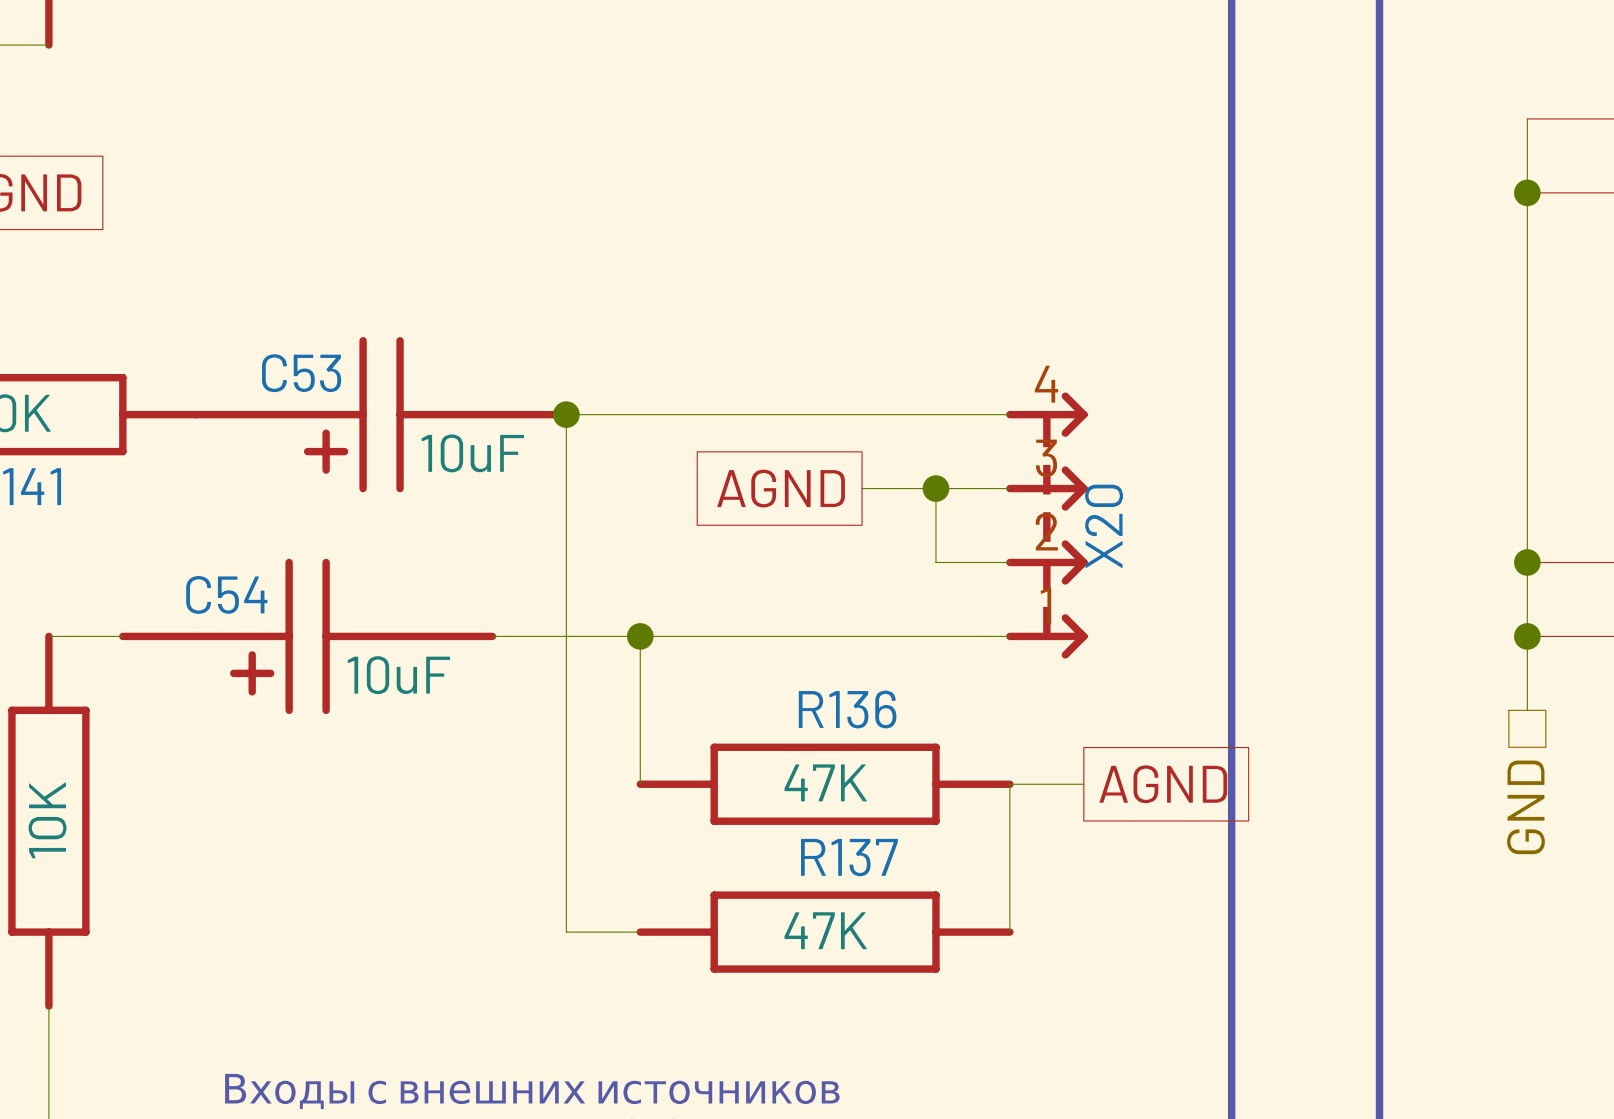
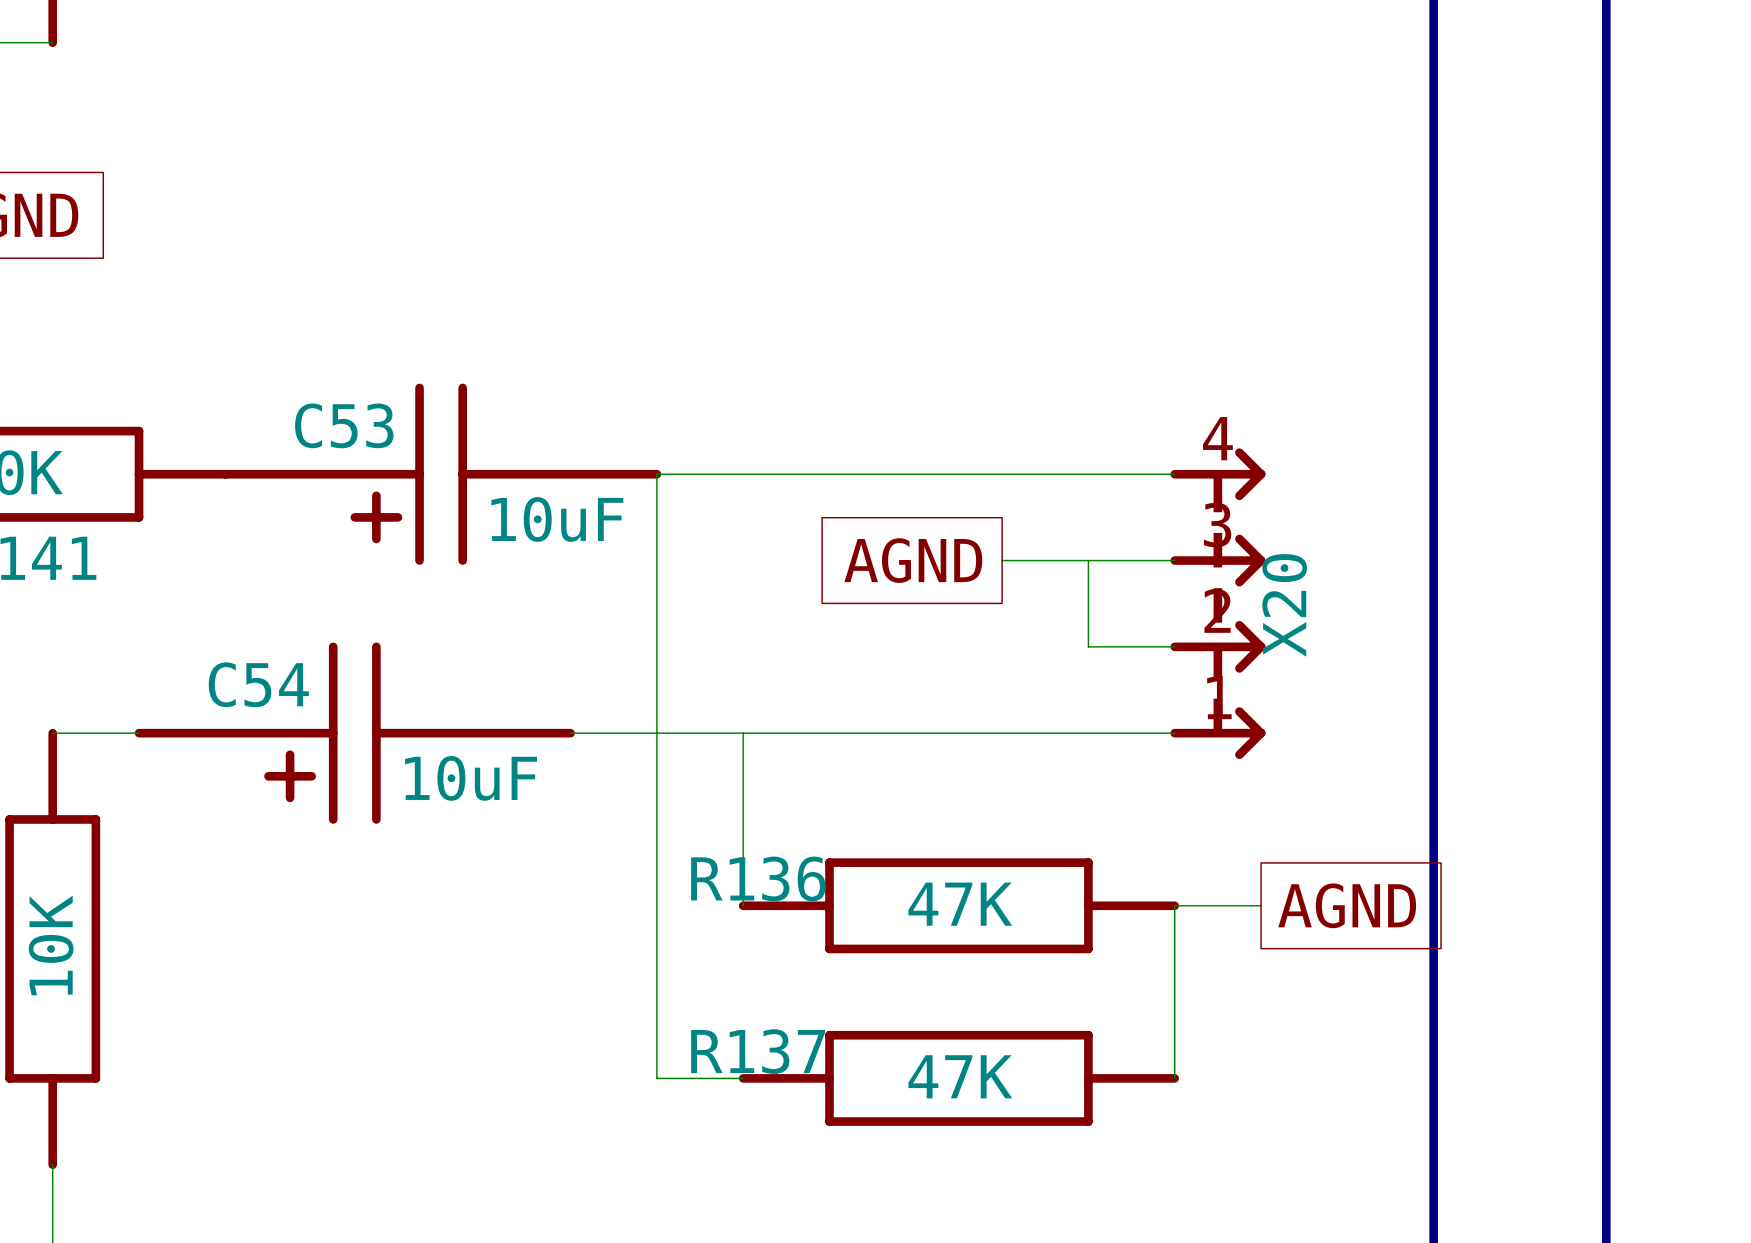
junction: (566, 414) -> none
junction: (935, 488) -> none
junction: (640, 636) -> none
R136 name position: R136 (847, 709) -> R136 (758, 878)
R137 name position: R137 (849, 857) -> R137 (758, 1051)

